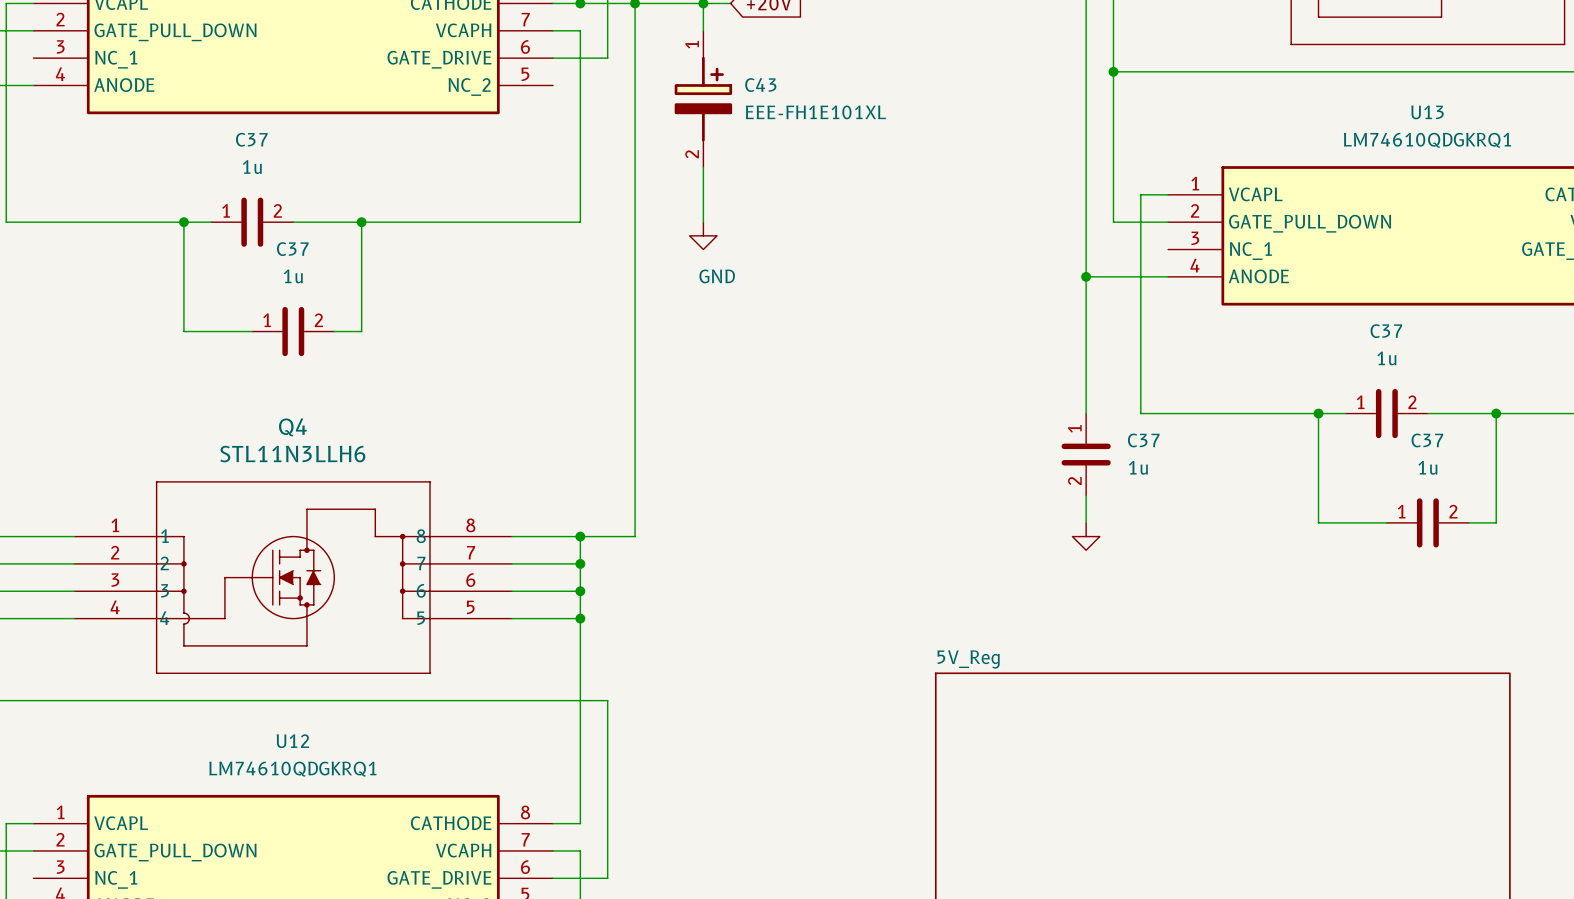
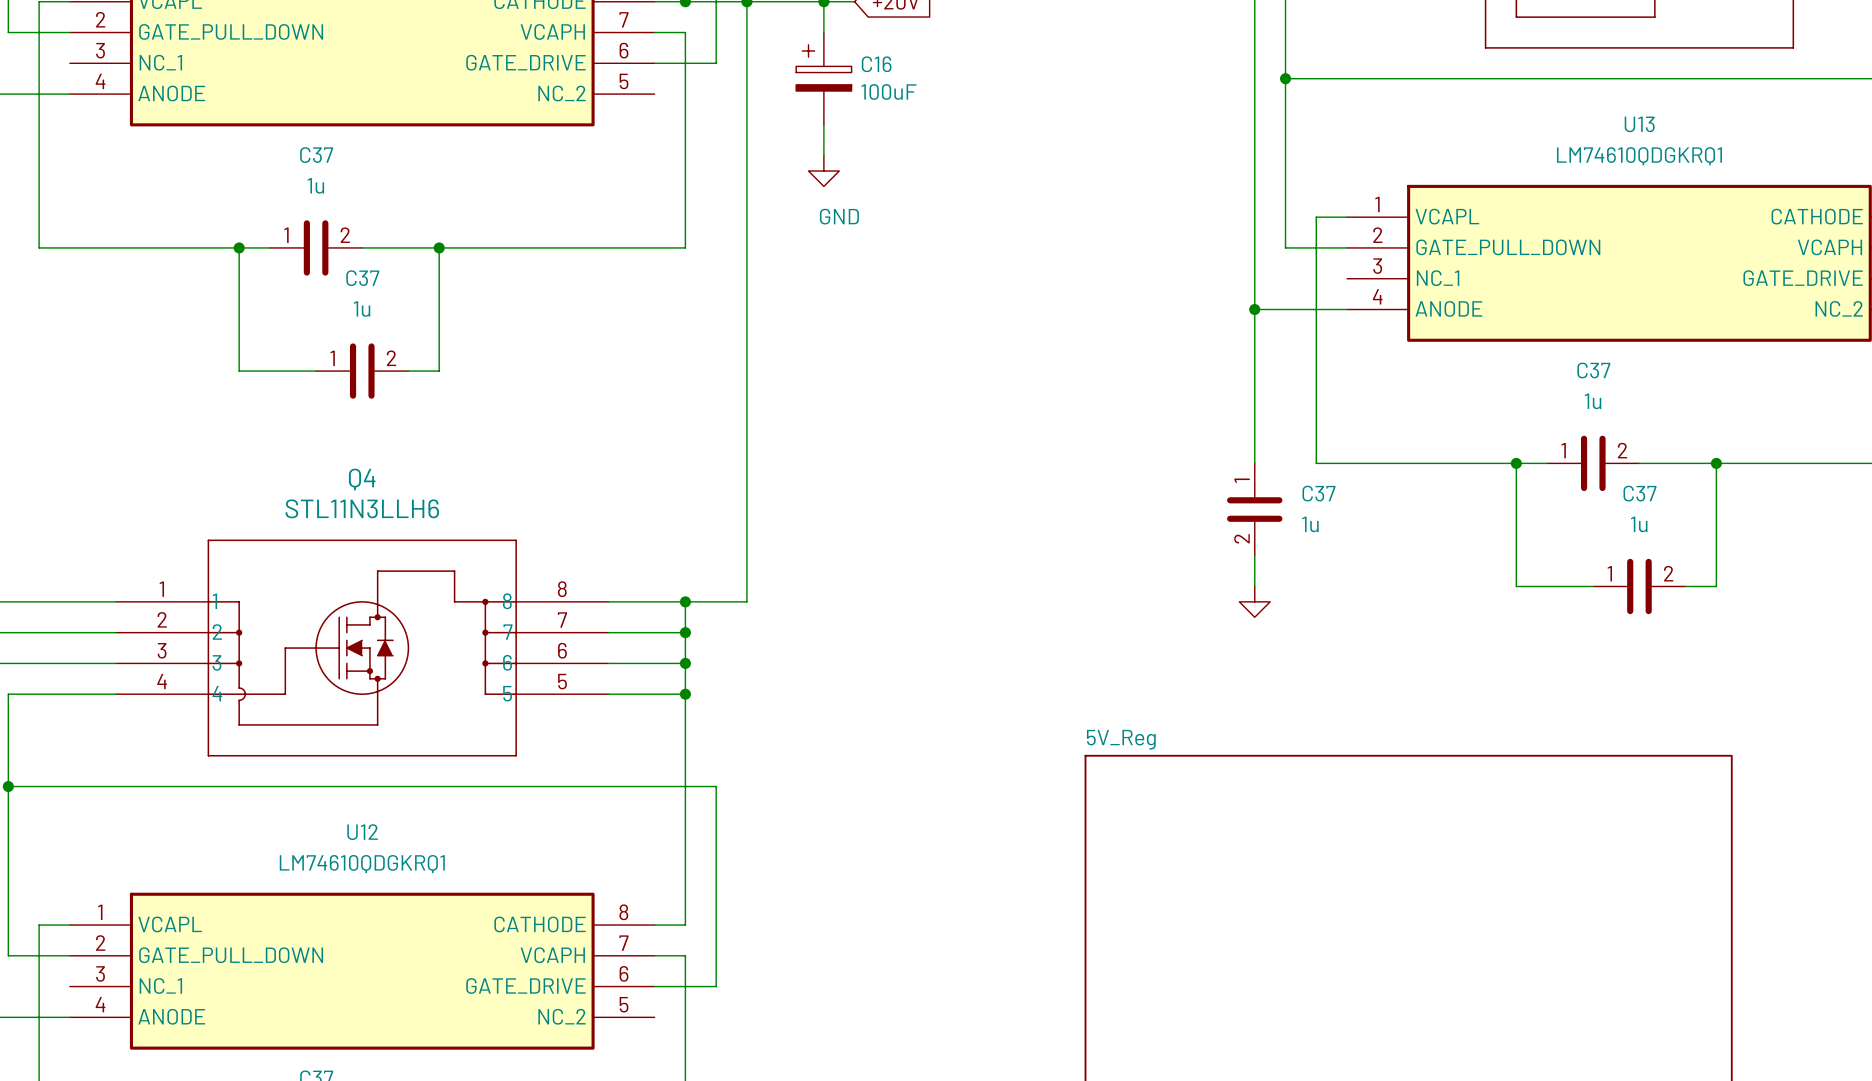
C16: none -> 100uF (823, 78)
C43: EEE-FH1E101XL (703, 99) -> none
wire: (703, 167) (703, 222) -> none
power symbol position: GND (703, 235) -> GND (823, 171)

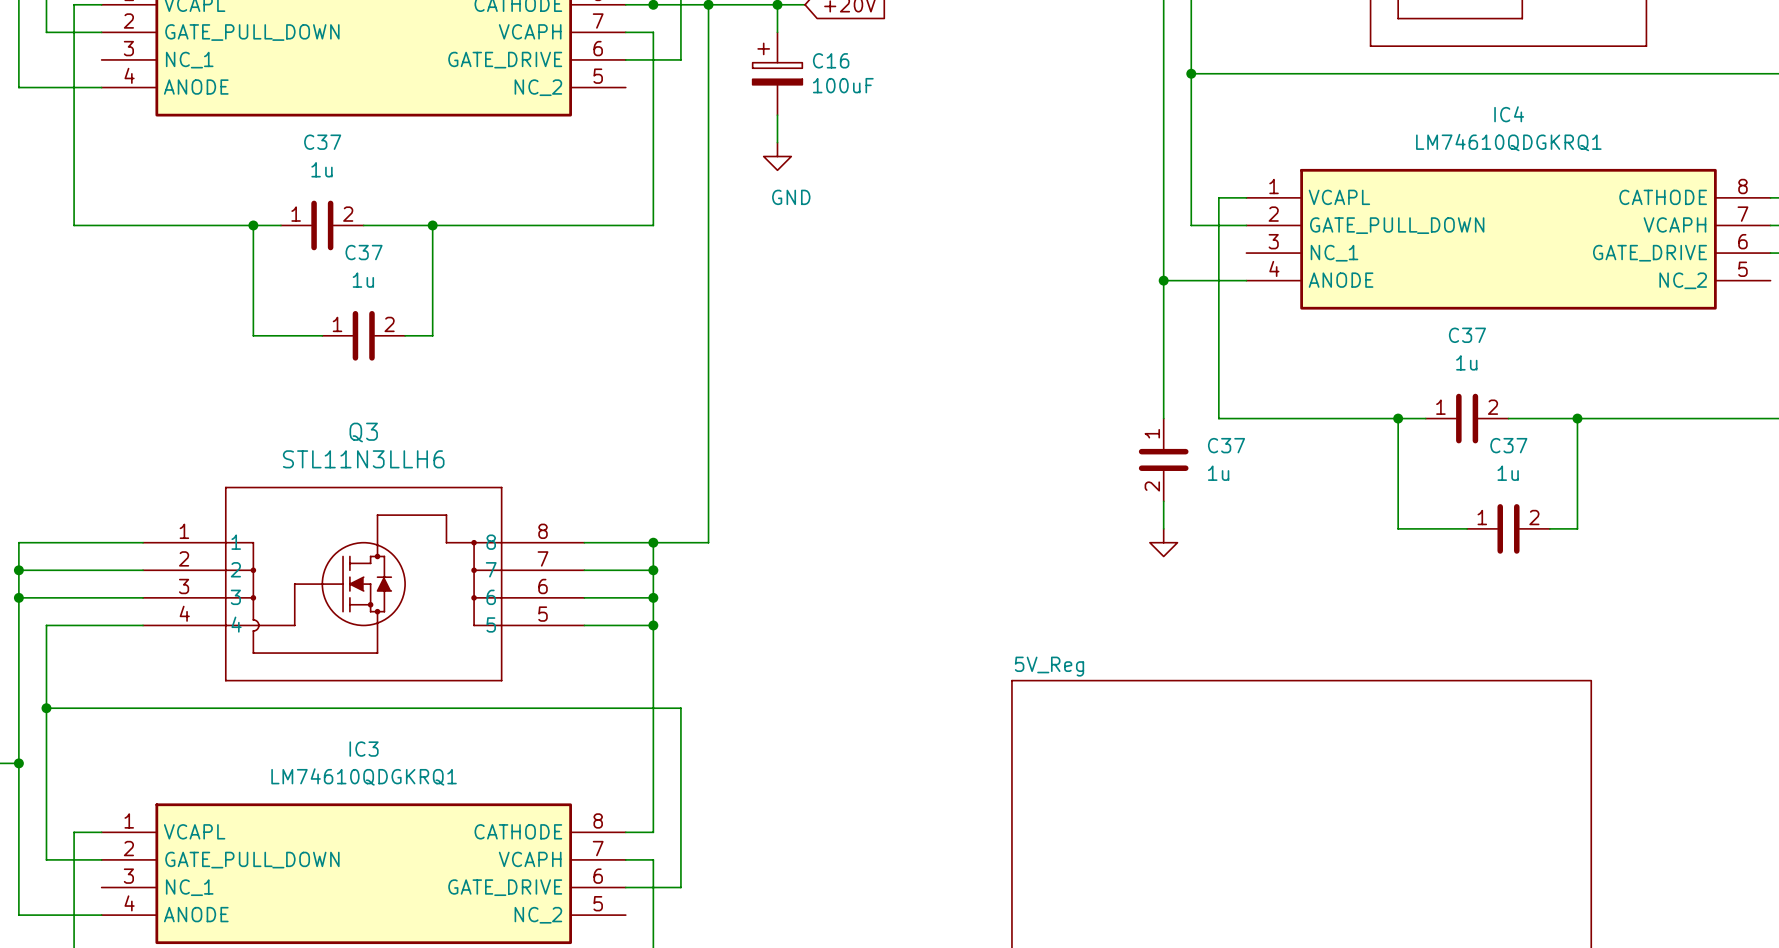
U13 name: U13 (1639, 124) -> IC4 (1509, 114)
Q4 name: Q4 (362, 479) -> Q3 (363, 432)
U12 name: U12 (362, 832) -> IC3 (364, 749)

